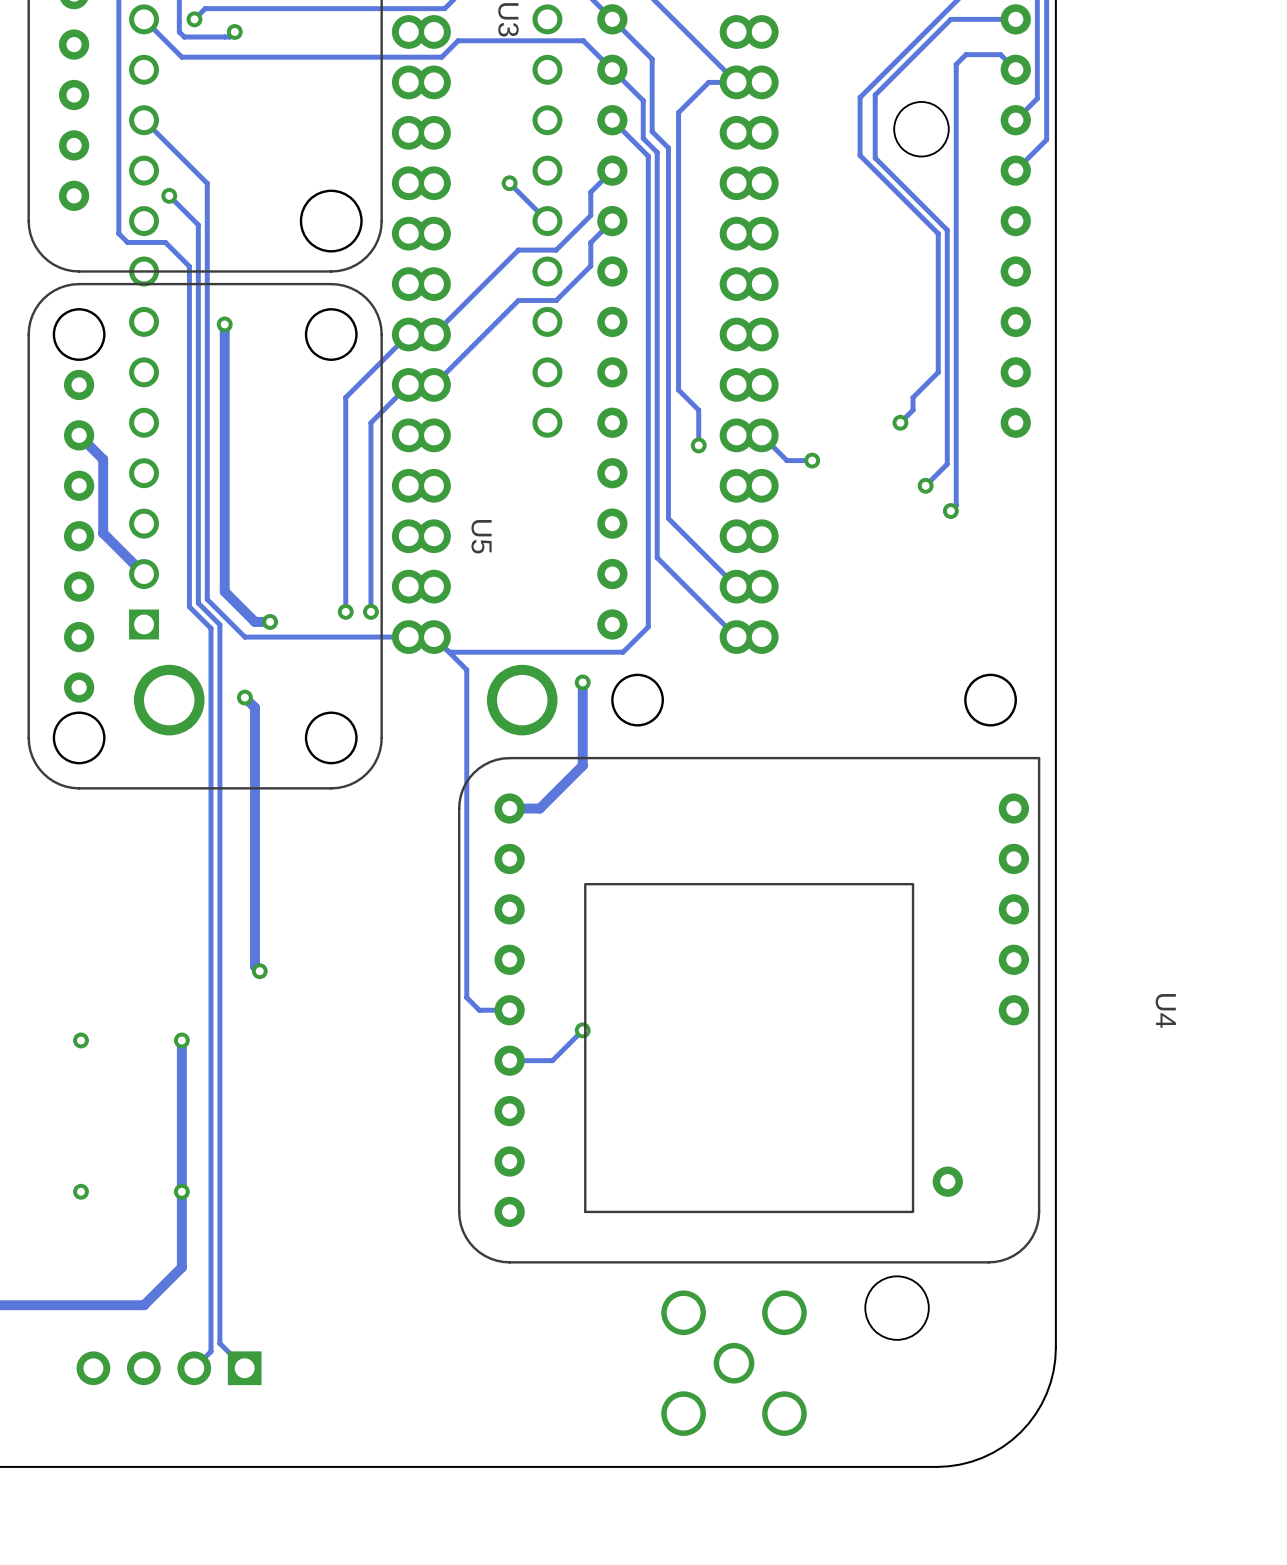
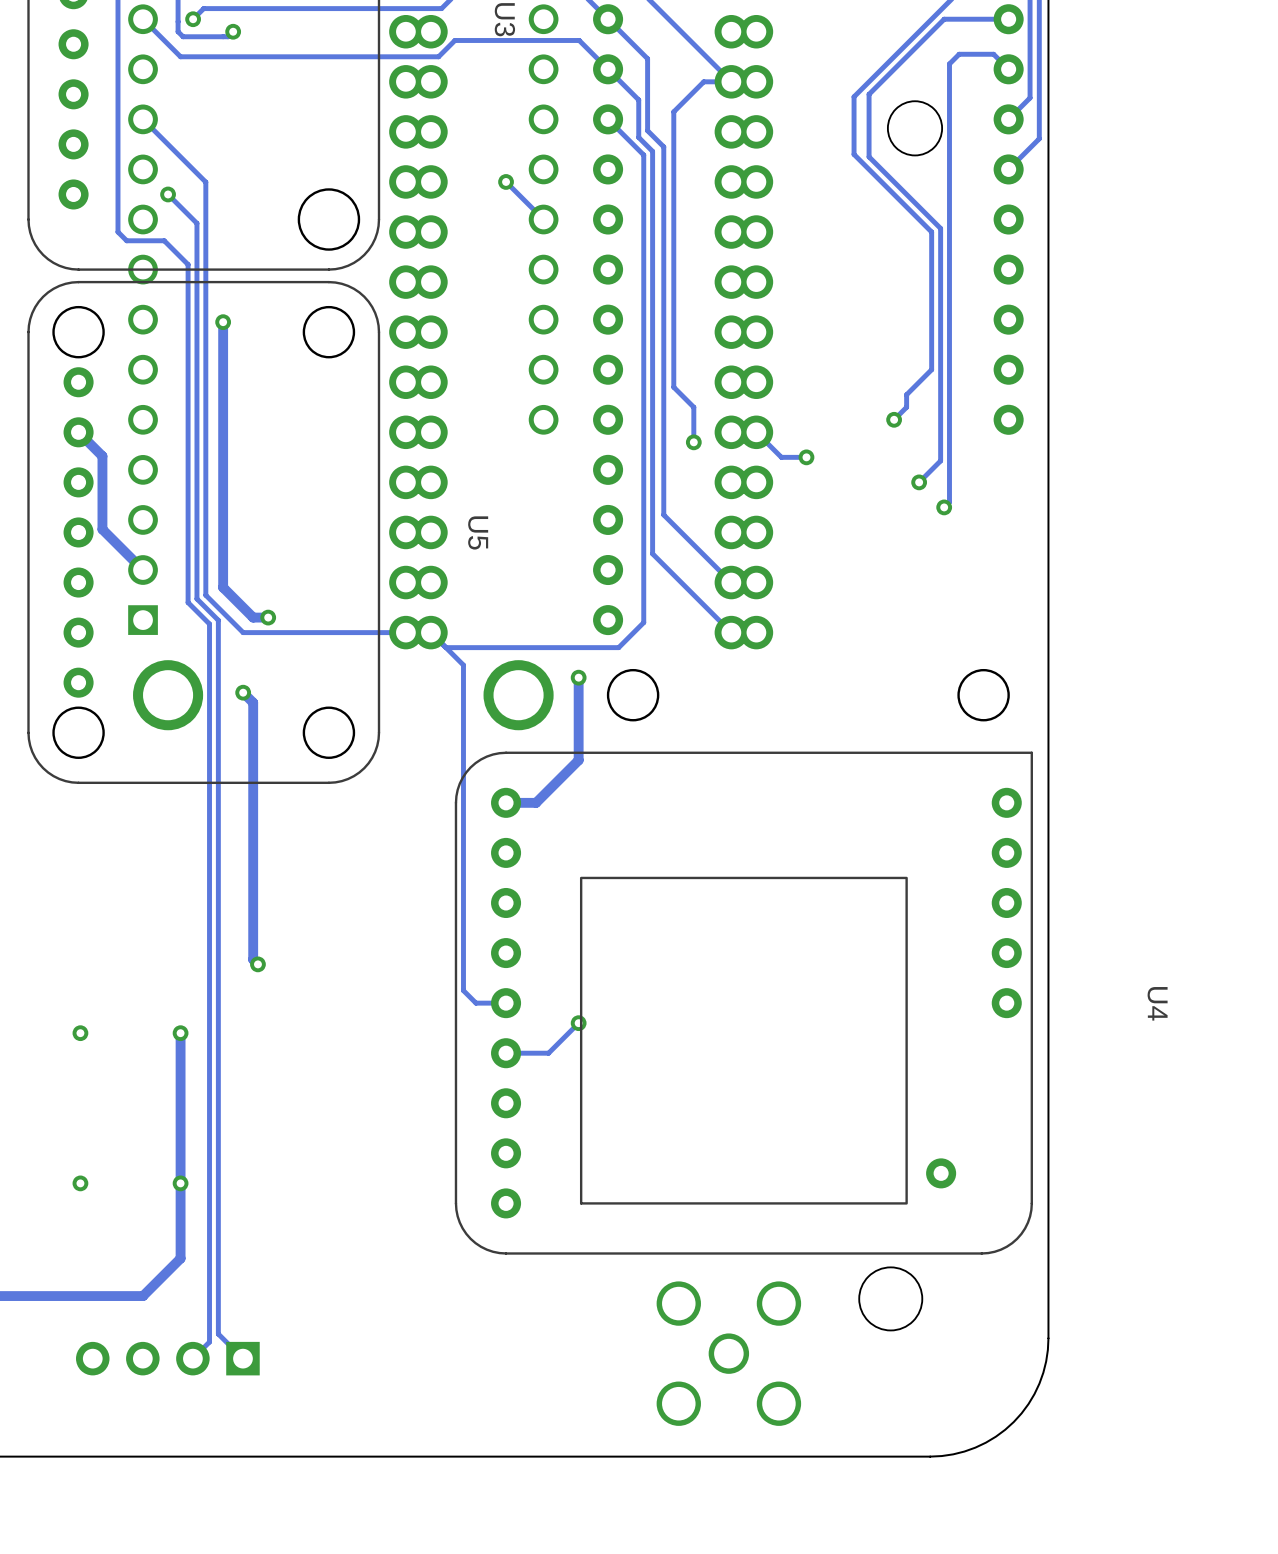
track: (612, 170) (590, 192) (590, 215) (556, 250) (518, 250) (433, 334) -> none
track: (612, 221) (590, 242) (590, 265) (556, 300) (518, 300) (433, 384) -> none
track: (408, 334) (345, 397) (345, 611) -> none
track: (408, 384) (370, 422) (370, 611) -> none
via: (345, 611) -> none
via: (370, 611) -> none

